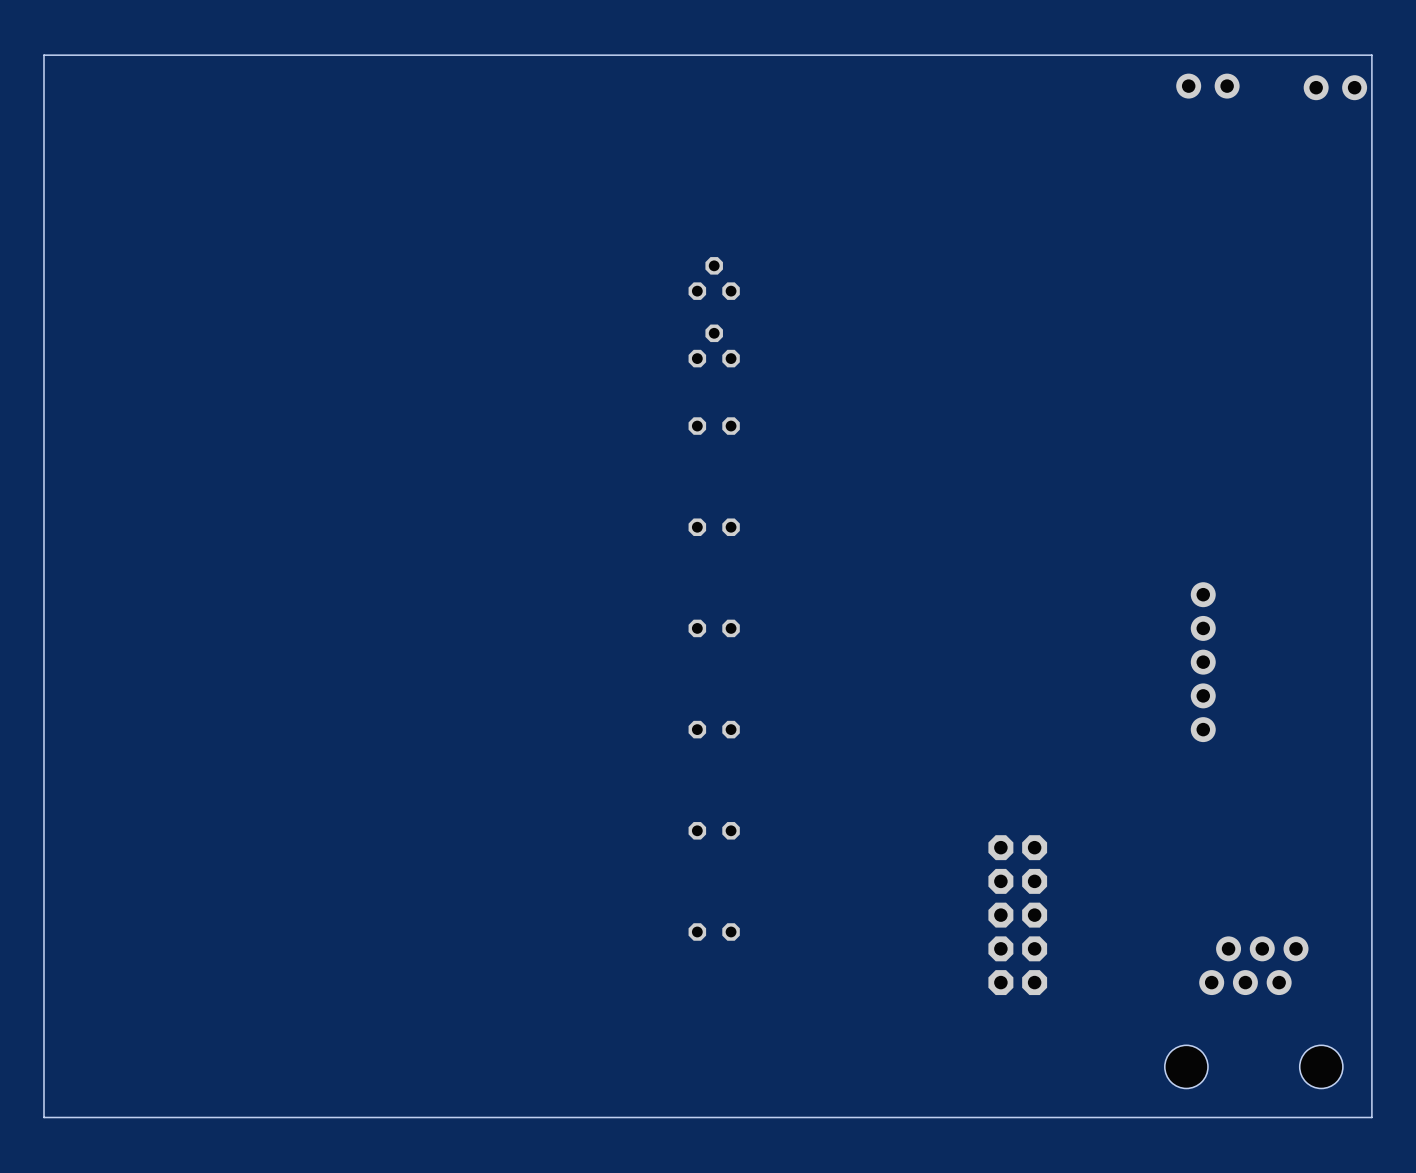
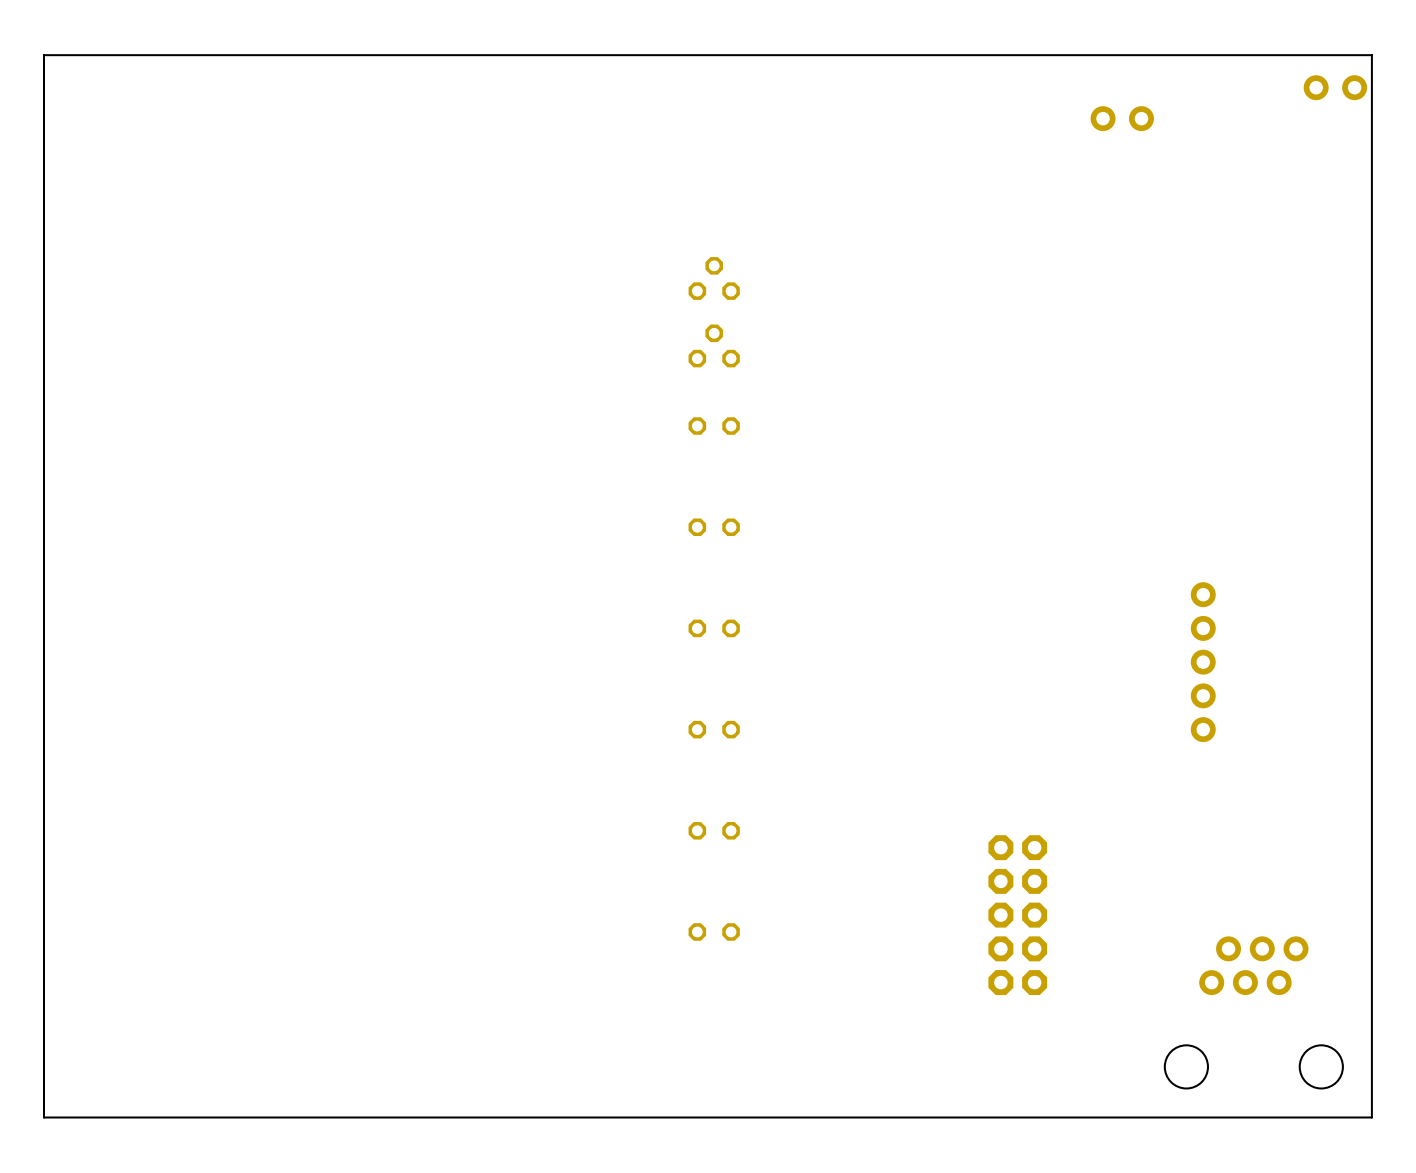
part position: (1207, 86) -> (1122, 118)

